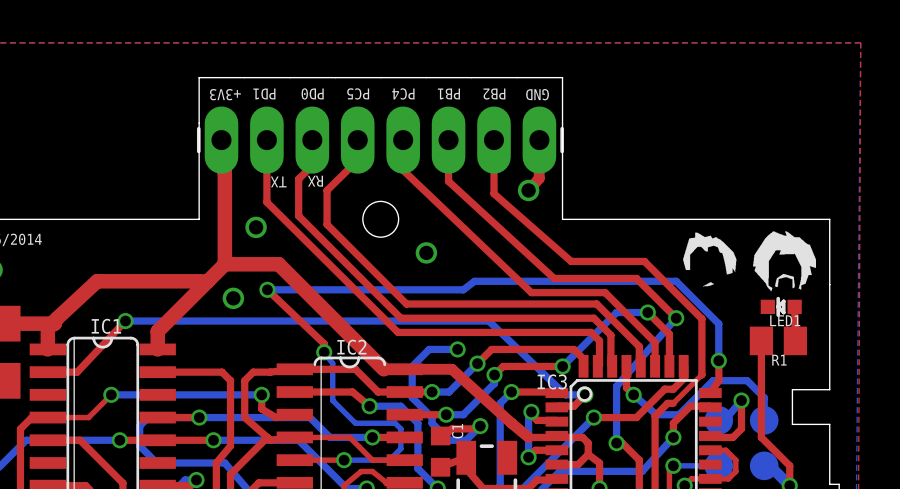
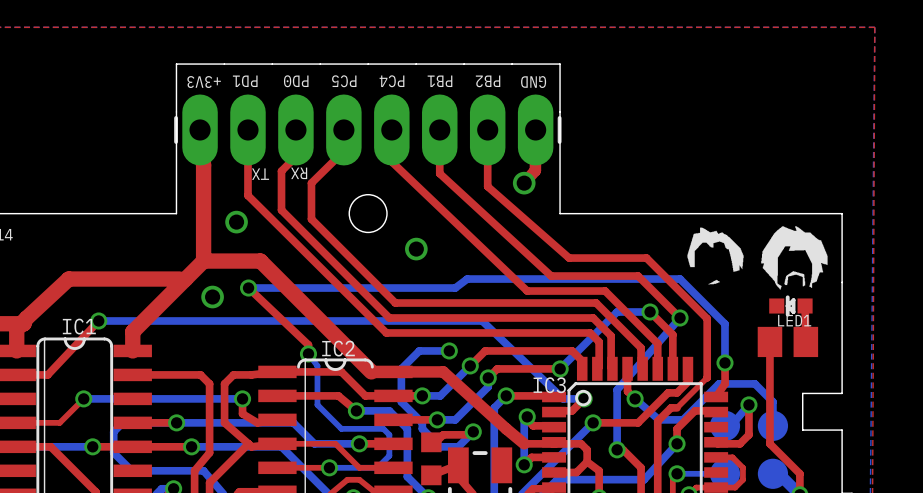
R1 name: R1 (779, 360) -> none
C1 name: C1 (457, 431) -> none

